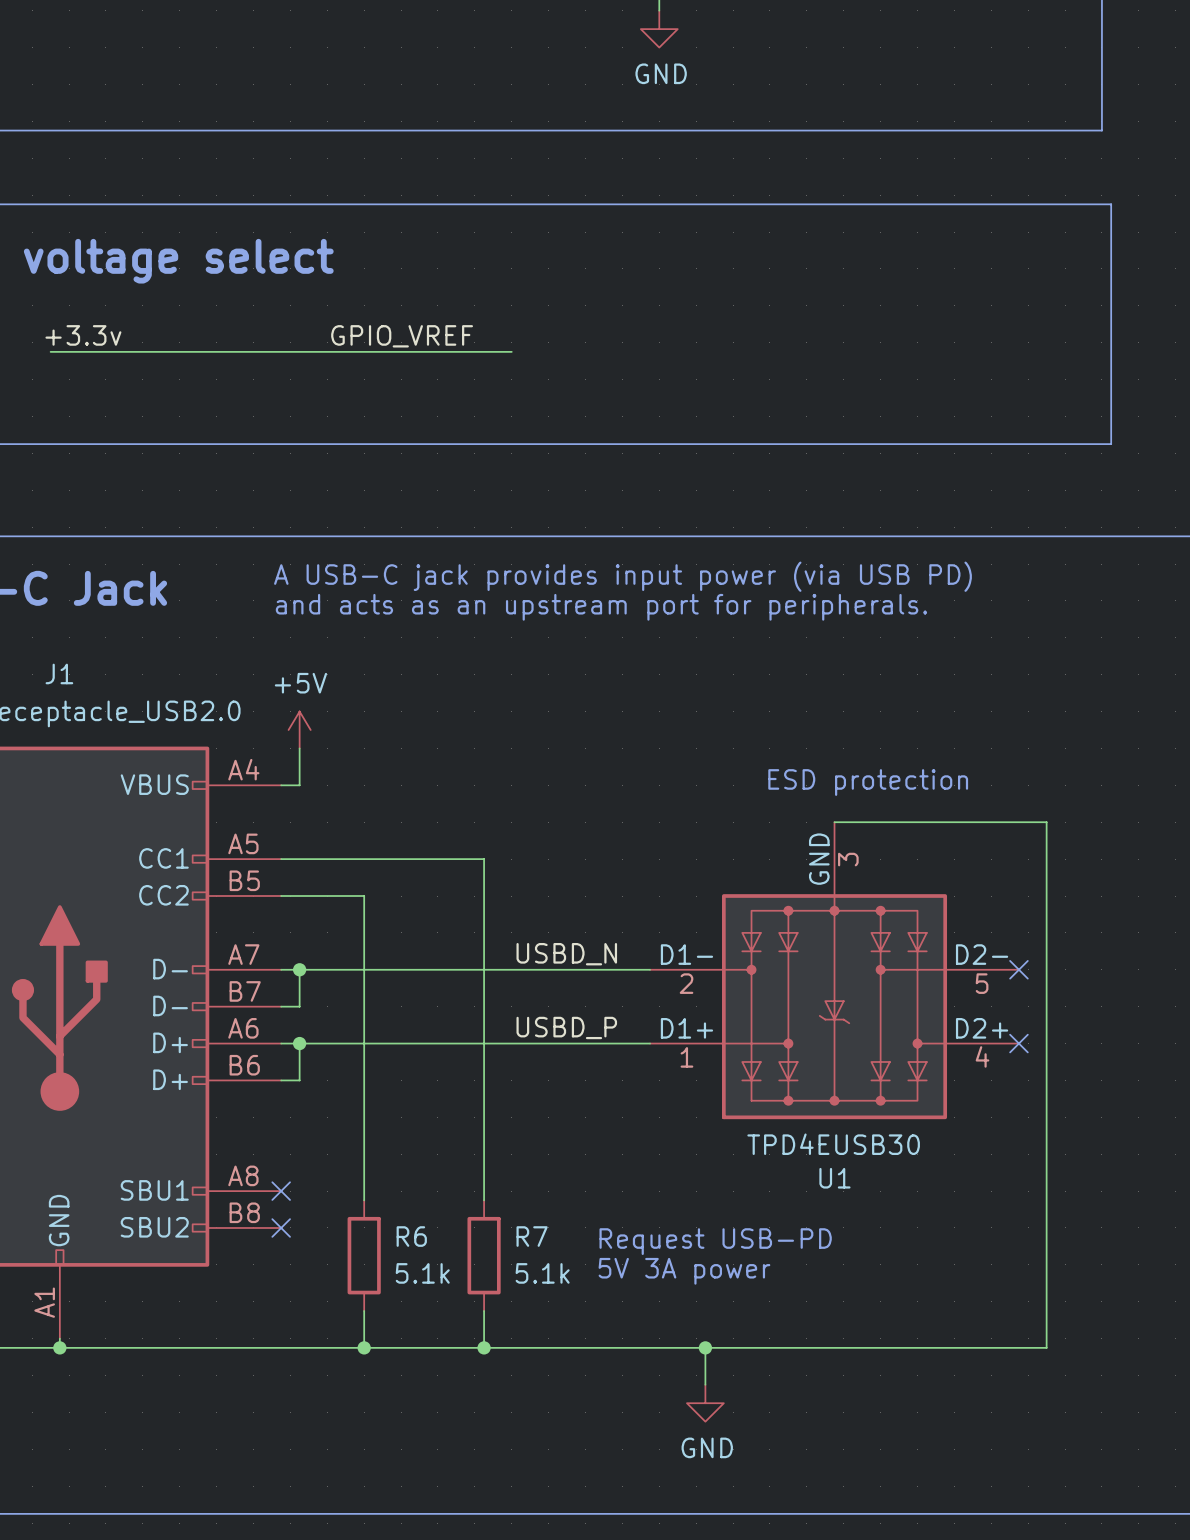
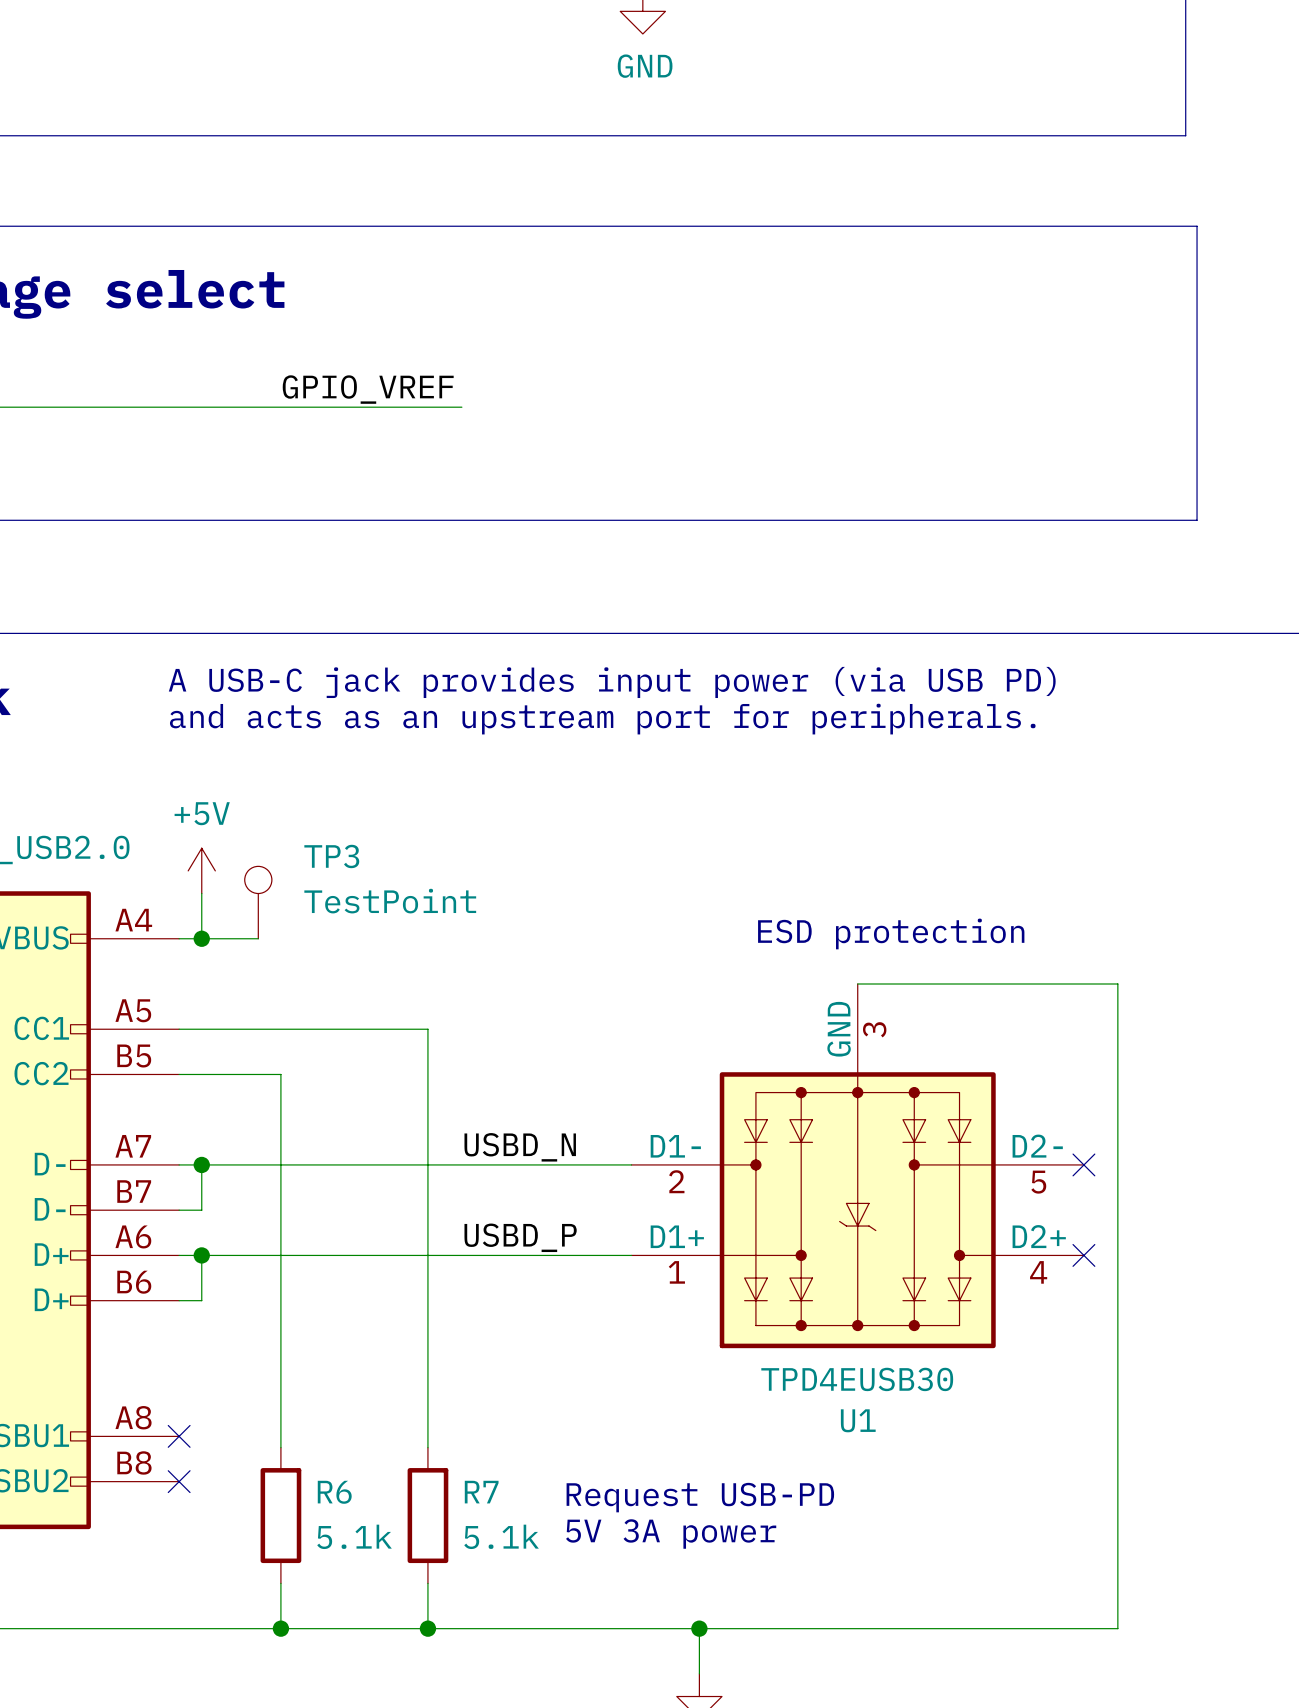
label position: GPIO_VREF (402, 336) -> GPIO_VREF (368, 389)
TP3: none -> TestPoint (258, 902)
wire: none -> (201, 938) (258, 938)
junction: none -> (201, 938)

